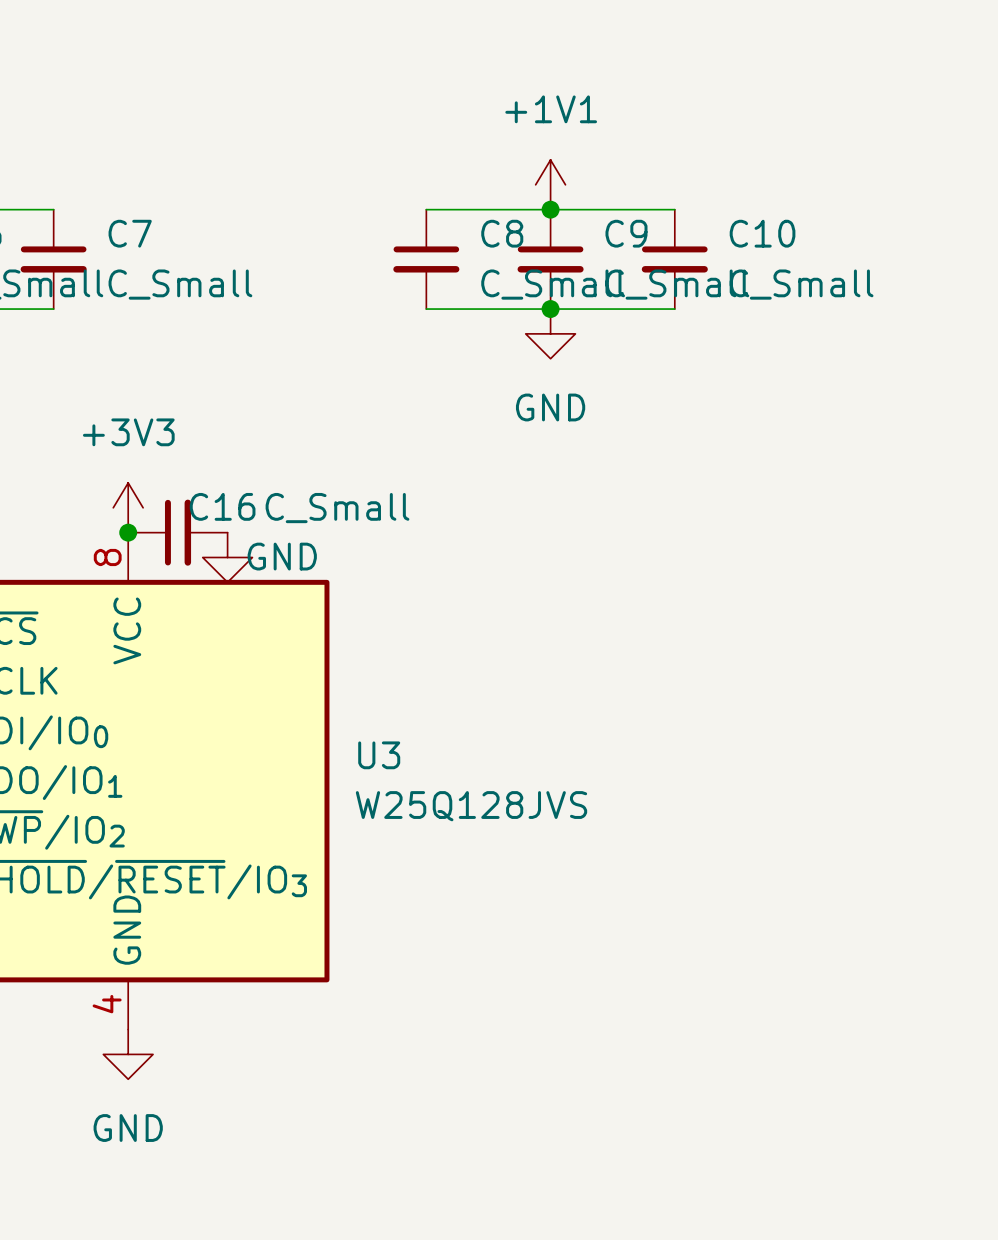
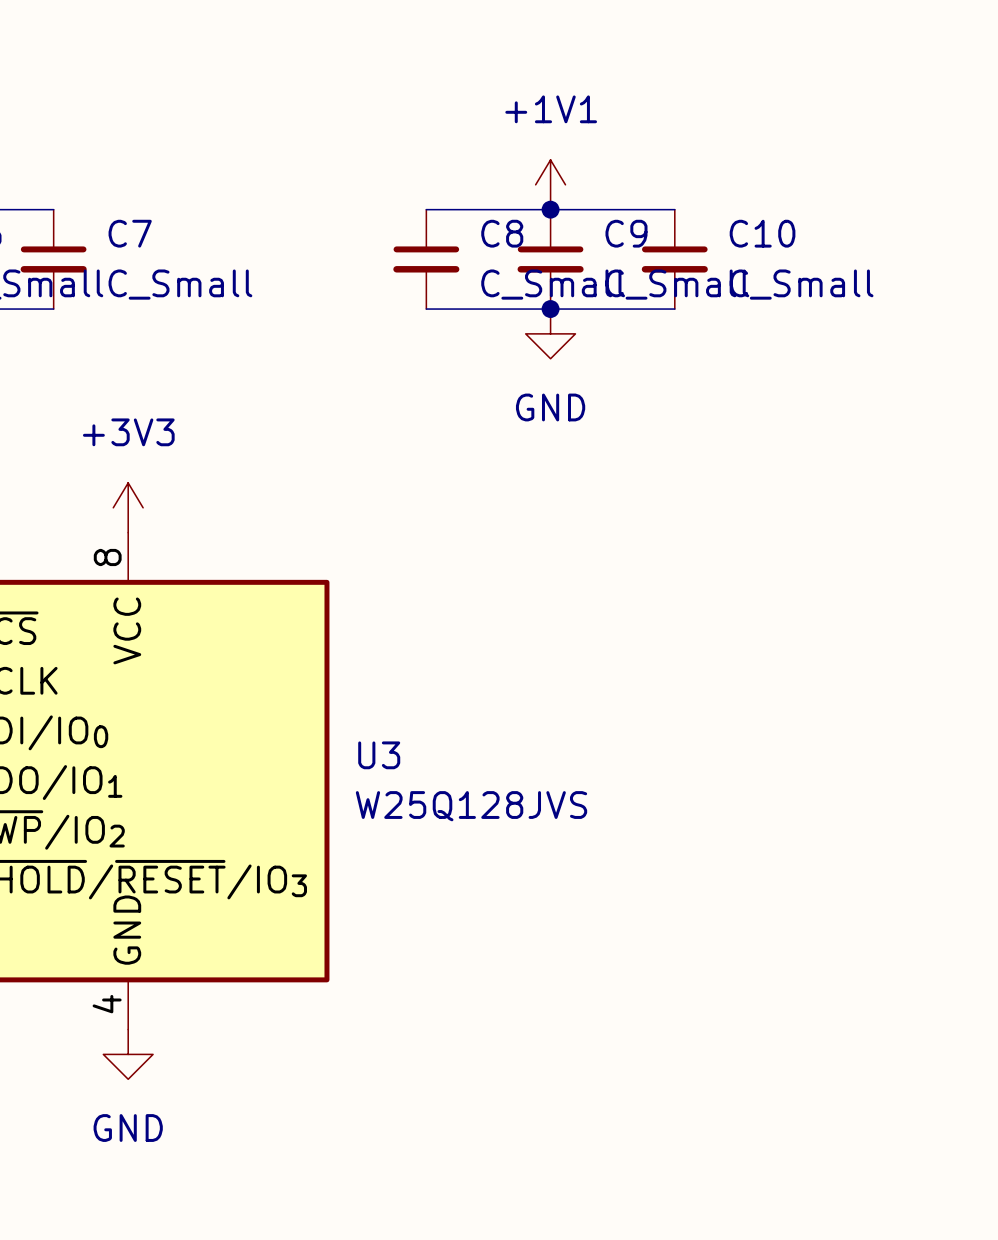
junction: (128, 532) -> none
C16: C_Small (177, 532) -> none
power symbol: GND (227, 557) -> none

